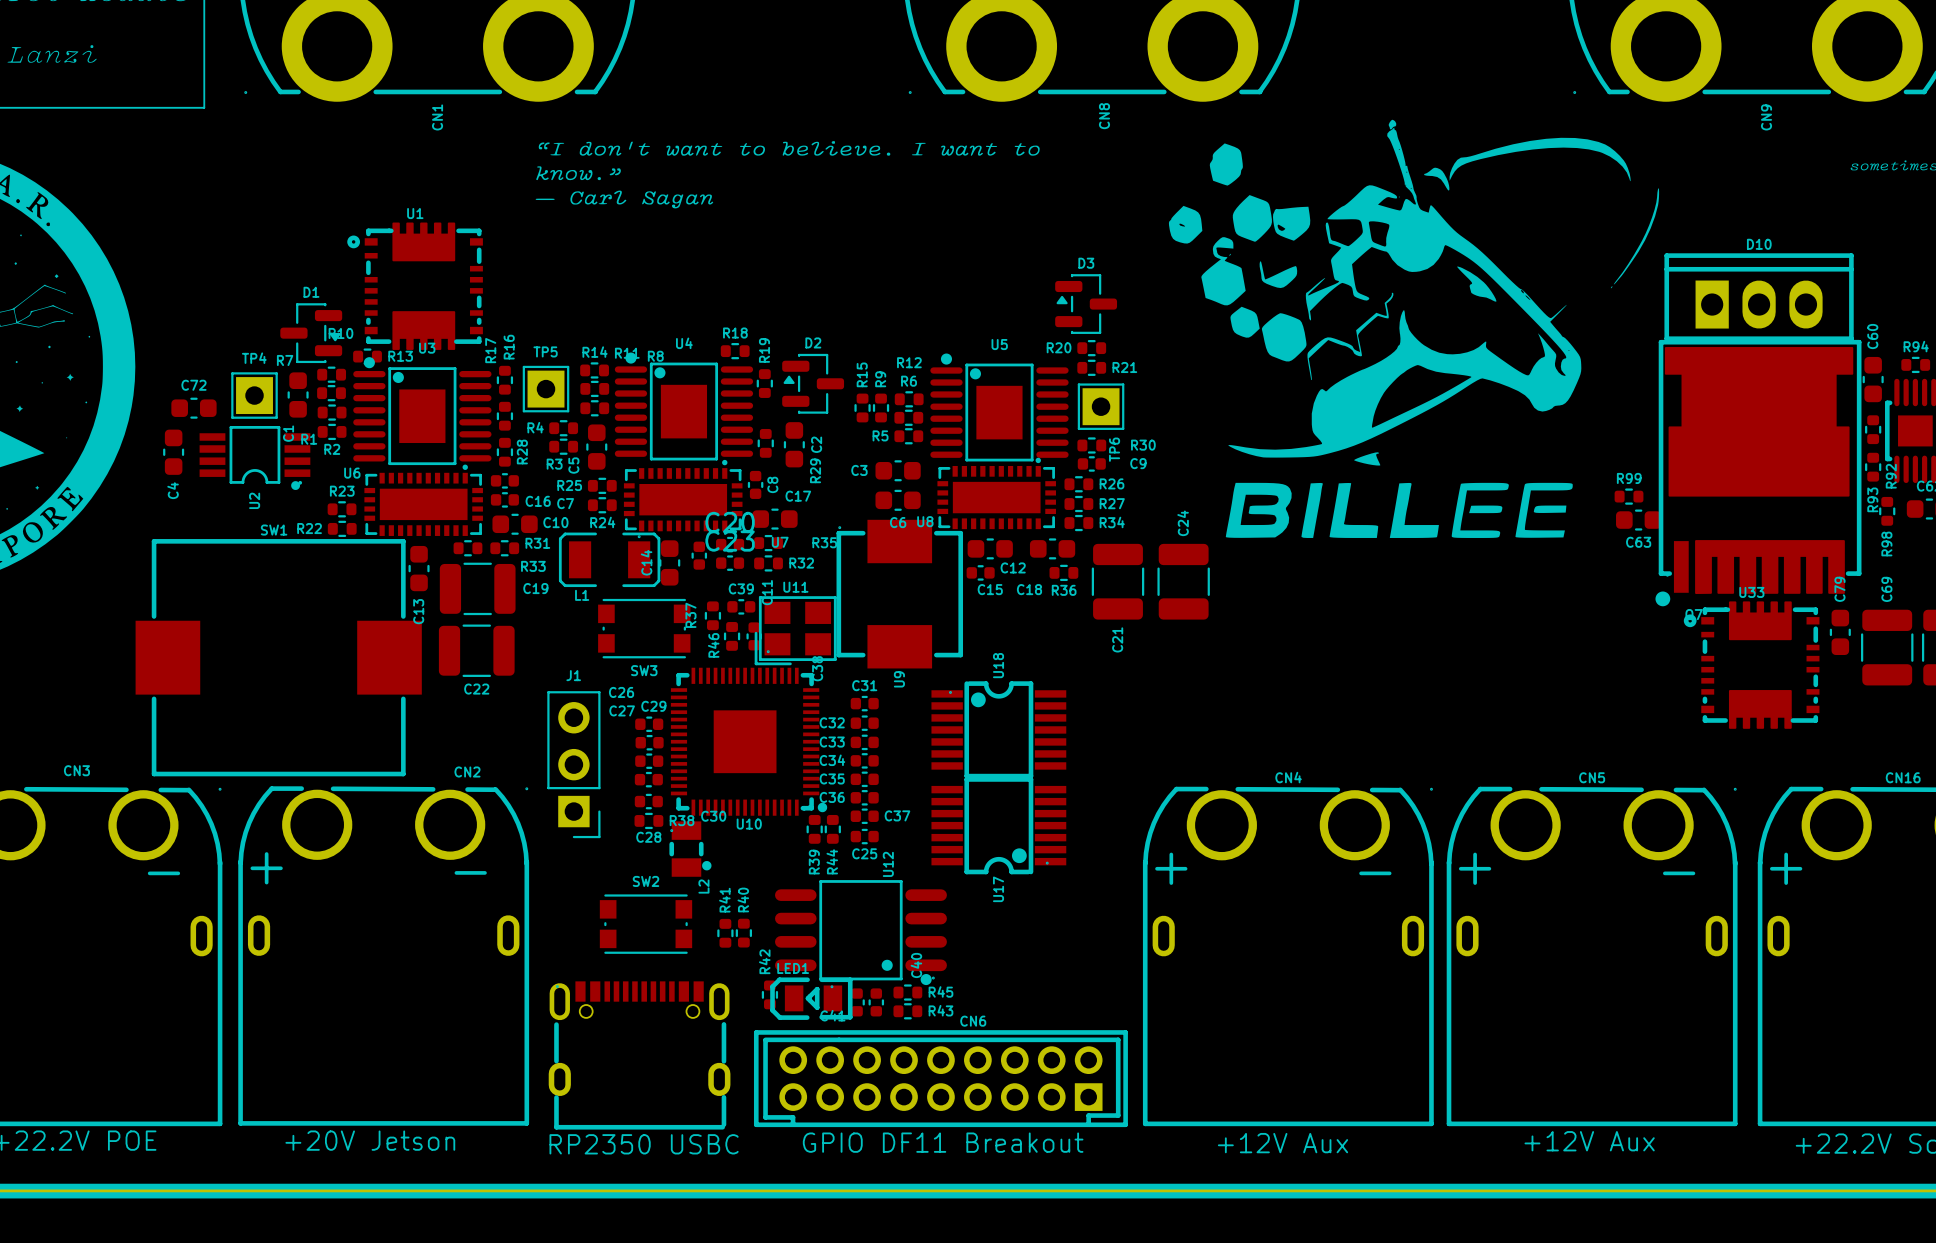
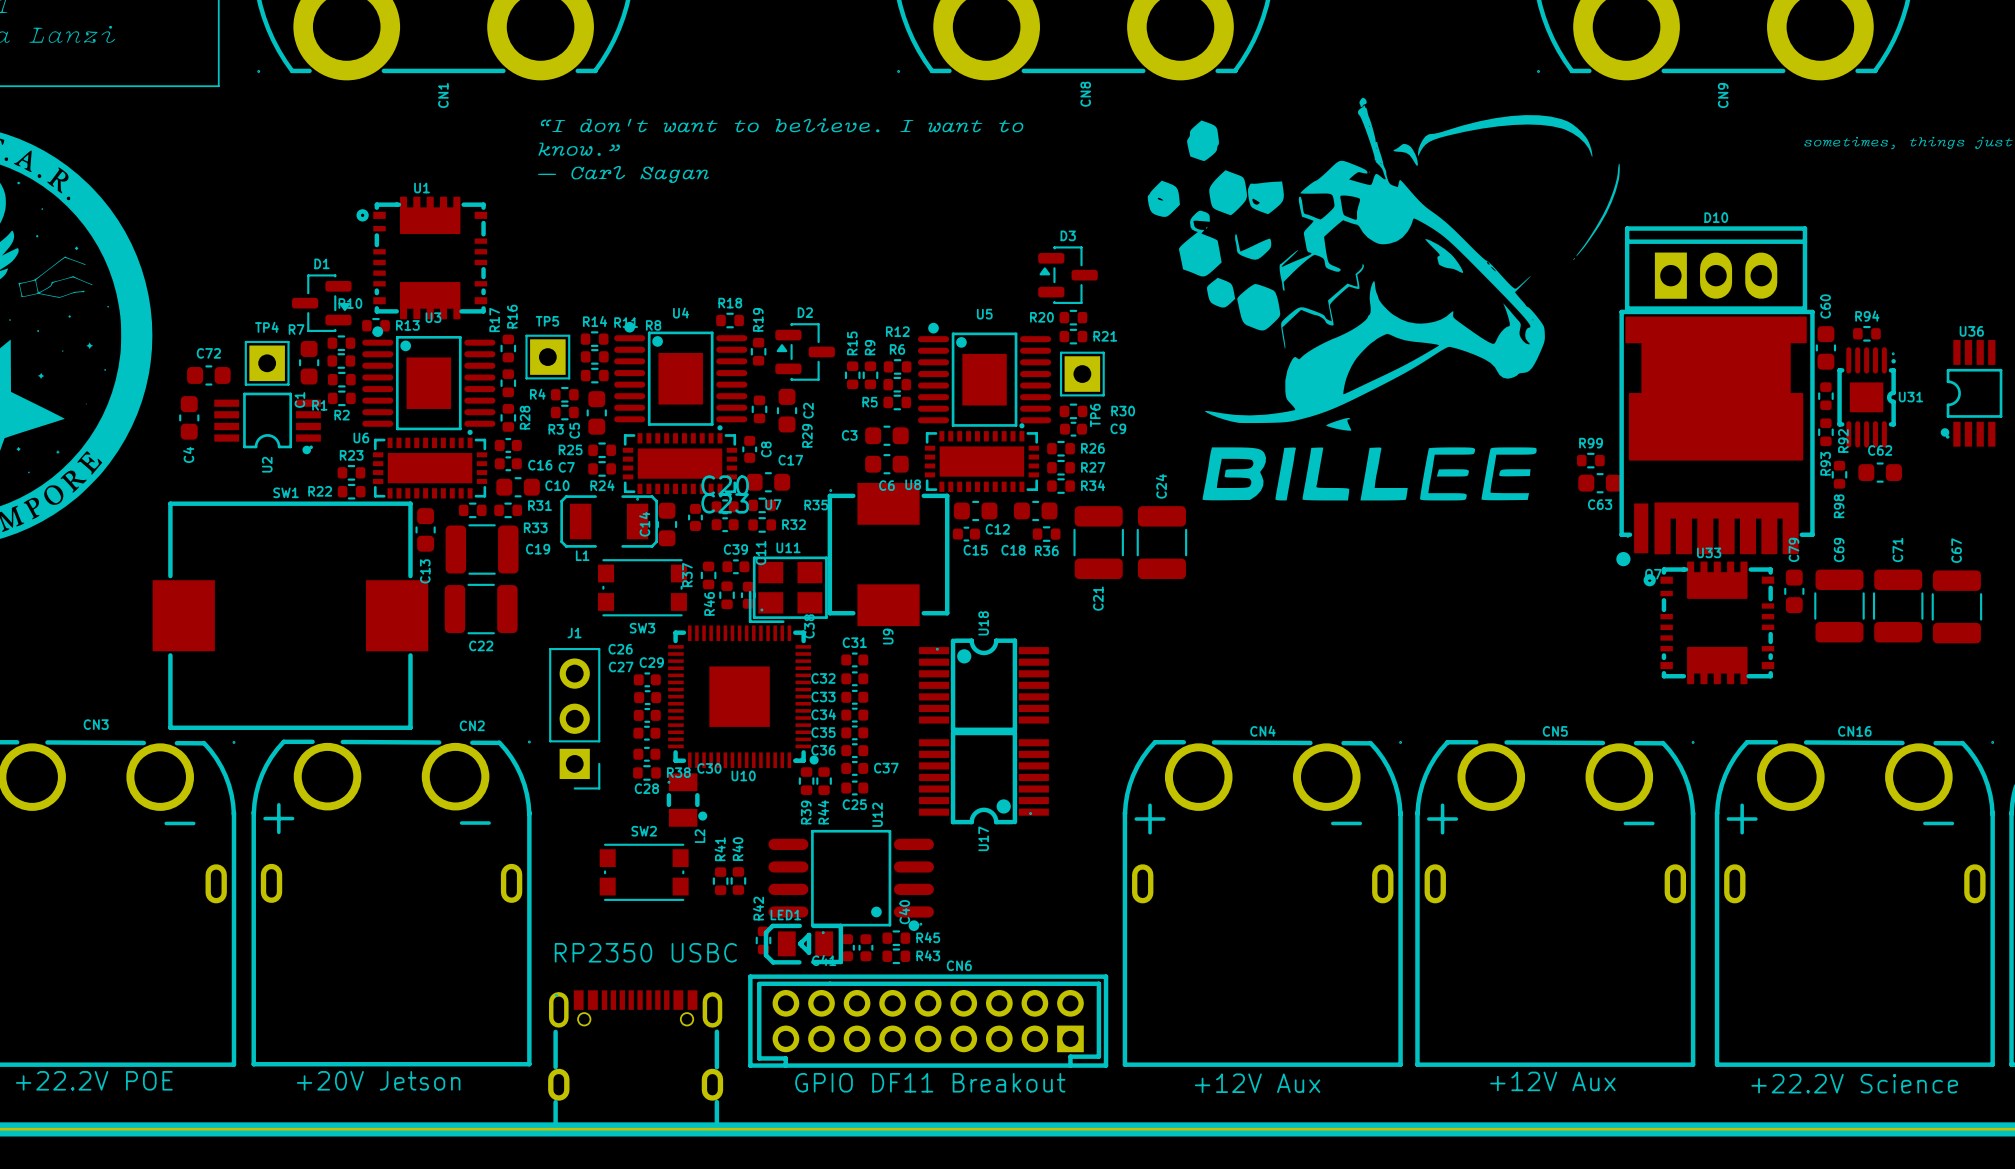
part position: (639, 1055) -> (635, 1061)
text position: RP2350 USBC (644, 1144) -> RP2350 USBC (645, 952)

